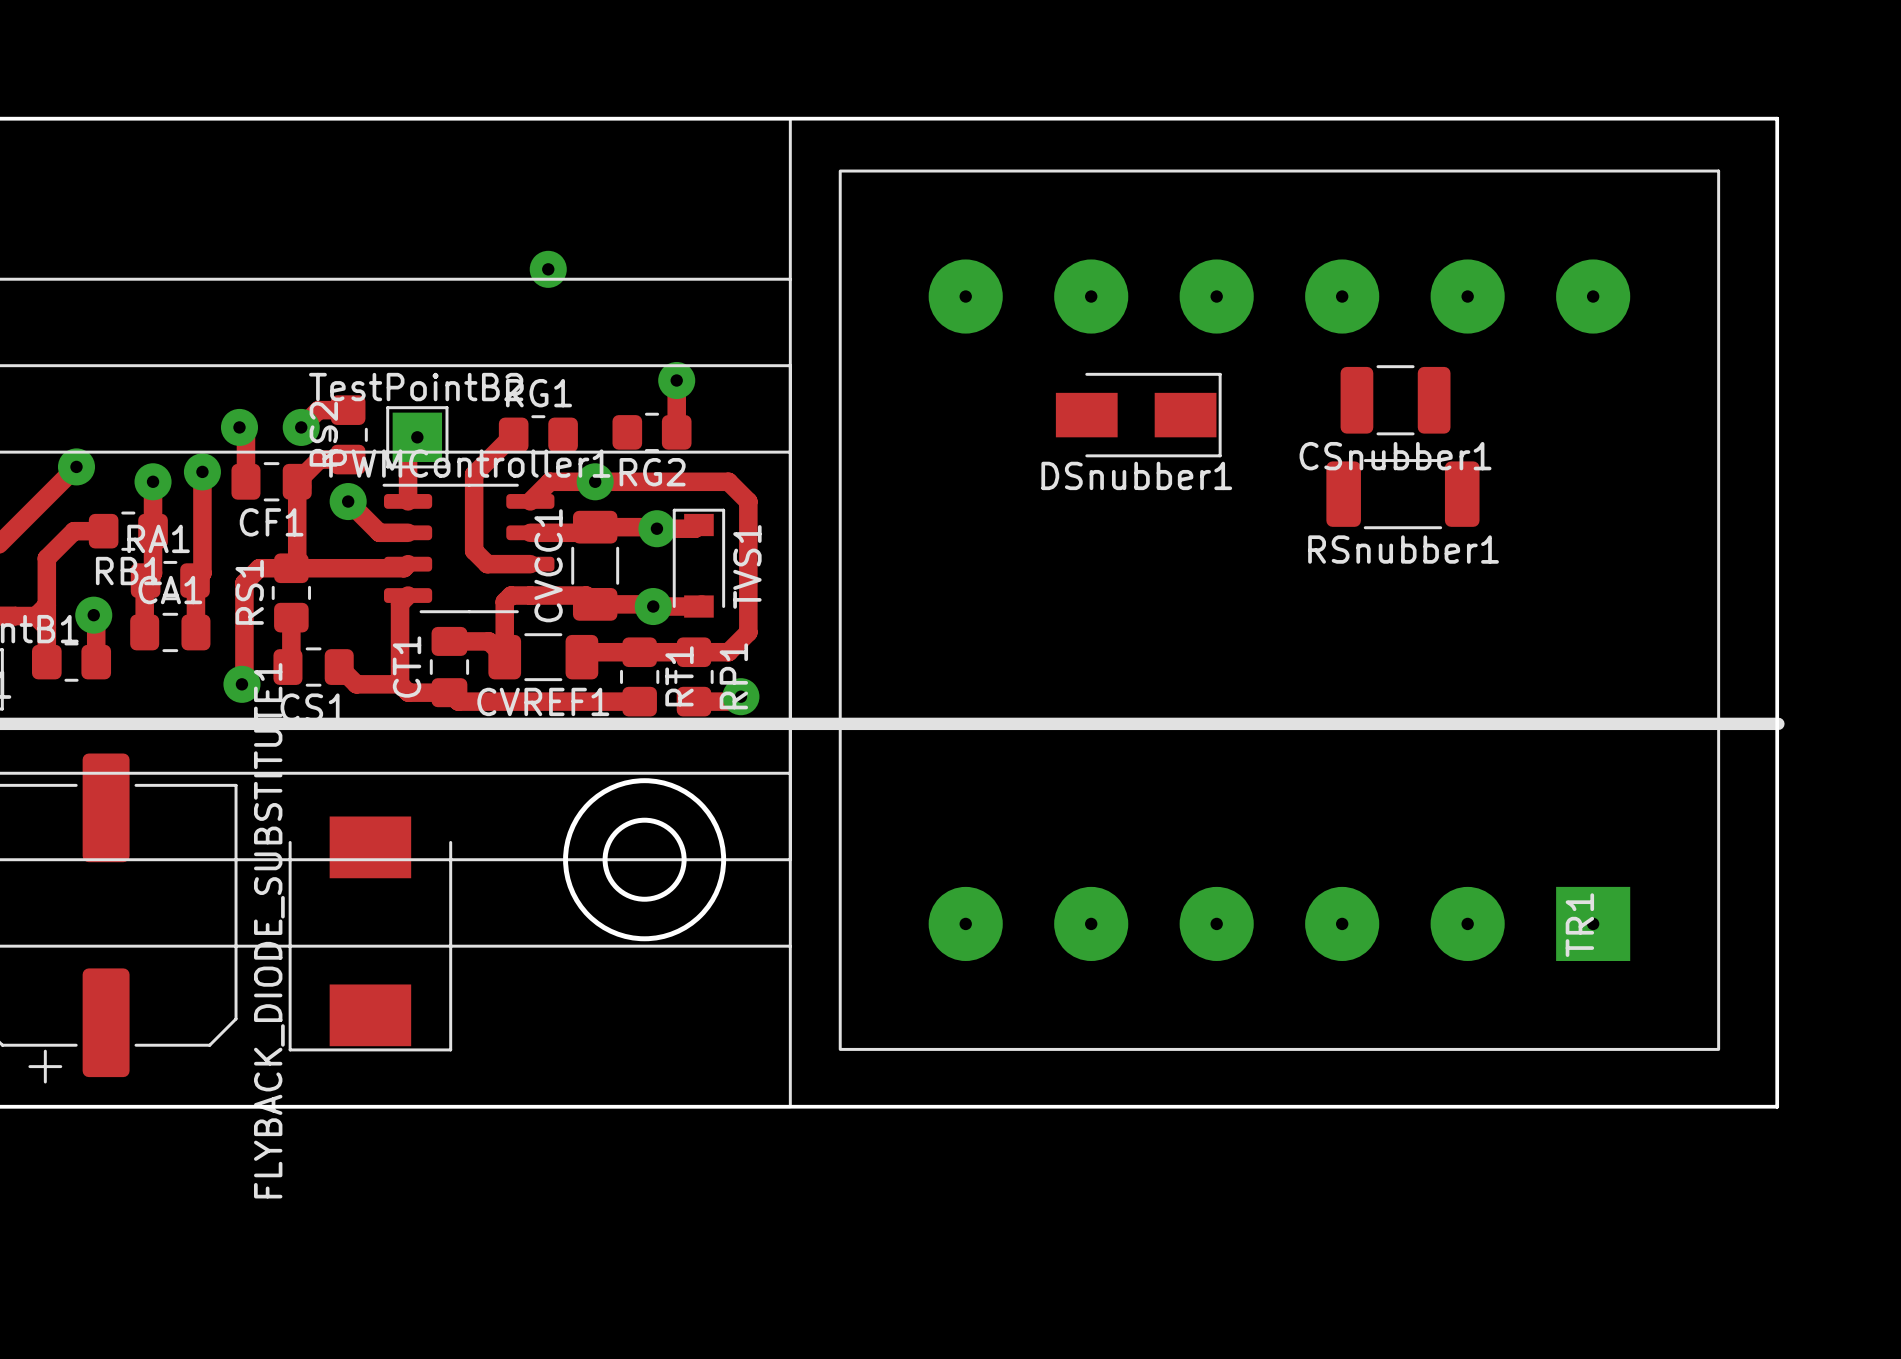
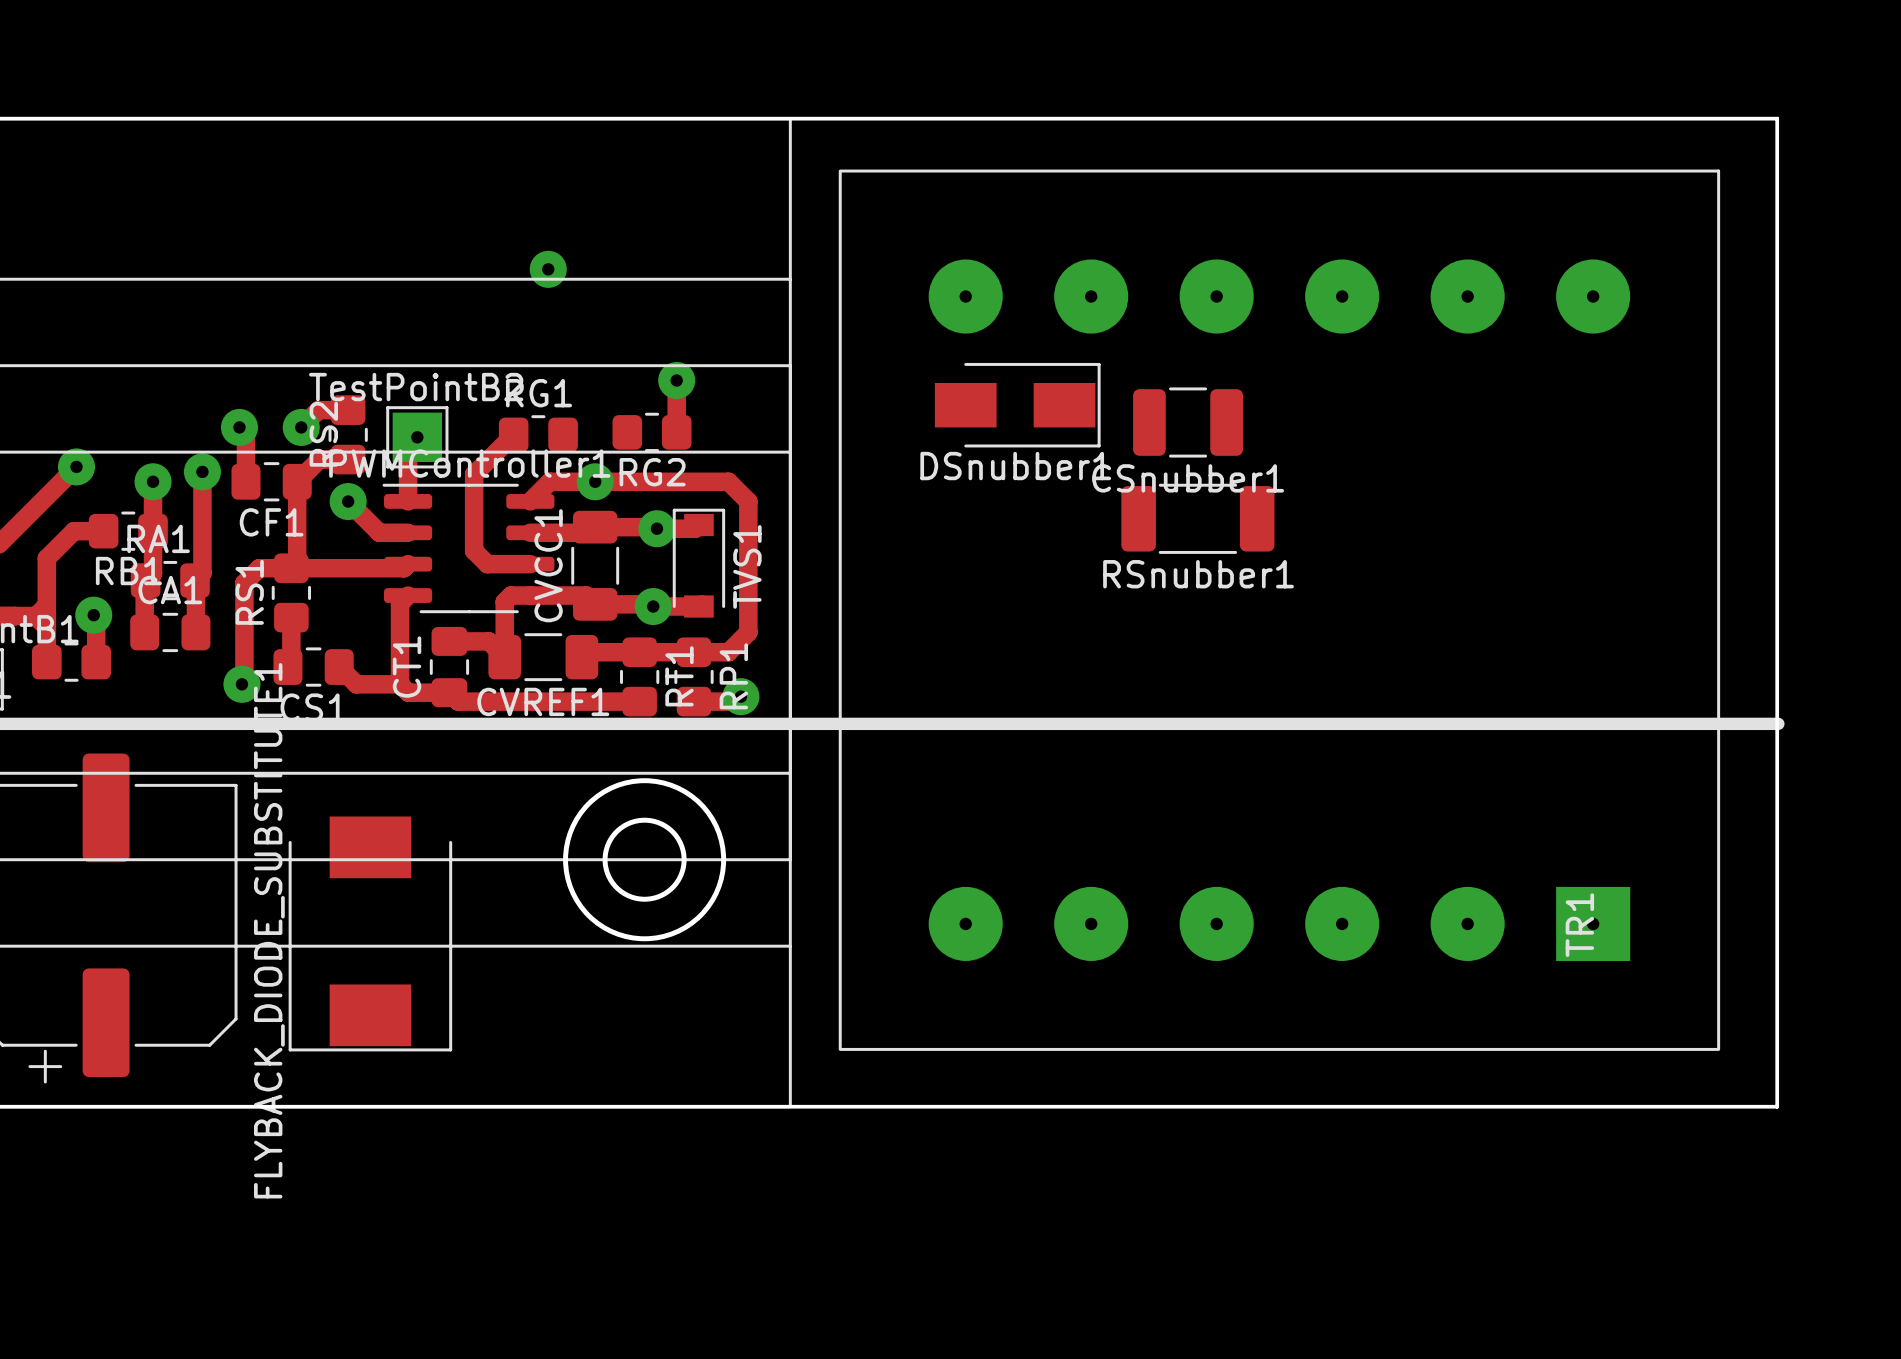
CSnubber1 position: (1395, 400) -> (1188, 422)
DSnubber1 position: (1138, 415) -> (1017, 405)
RSnubber1 position: (1402, 494) -> (1197, 518)

